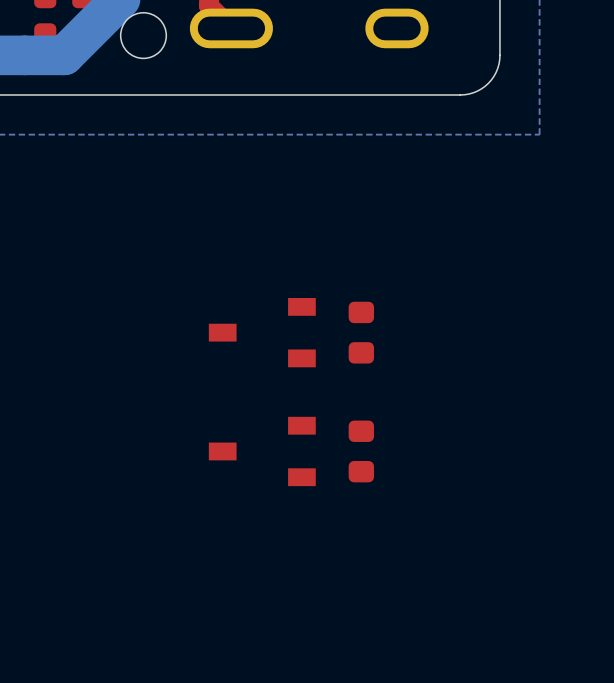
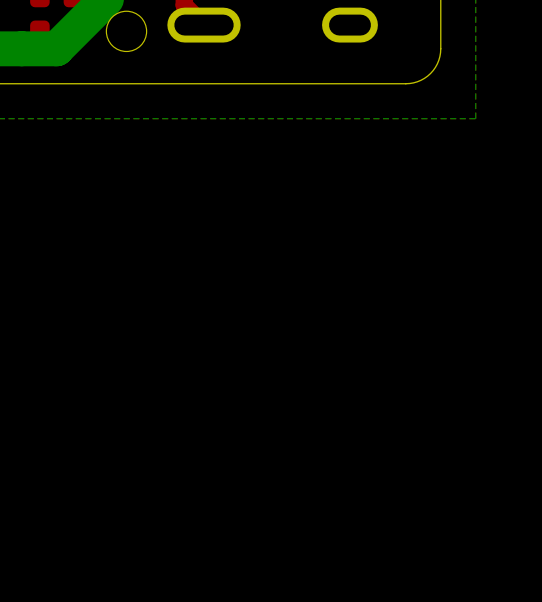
part: (262, 332) -> none
part: (361, 332) -> none
part: (262, 451) -> none
part: (361, 451) -> none

